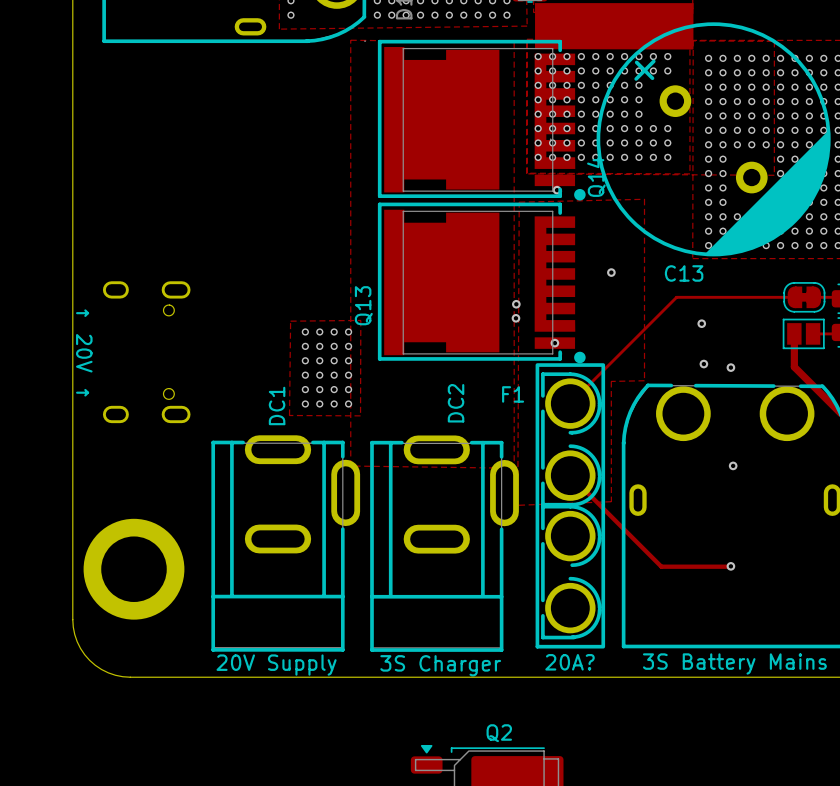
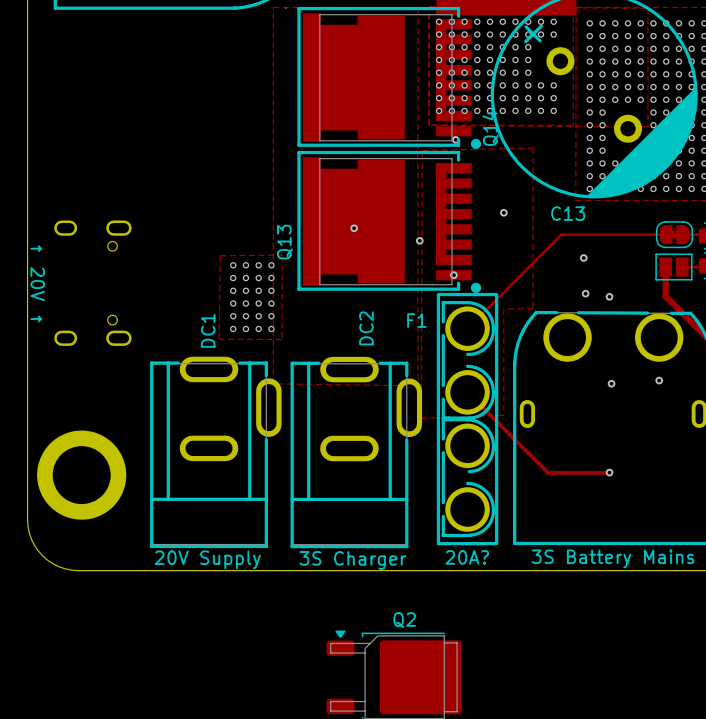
via position: (515, 318) -> (354, 228)
via: none -> (659, 380)

